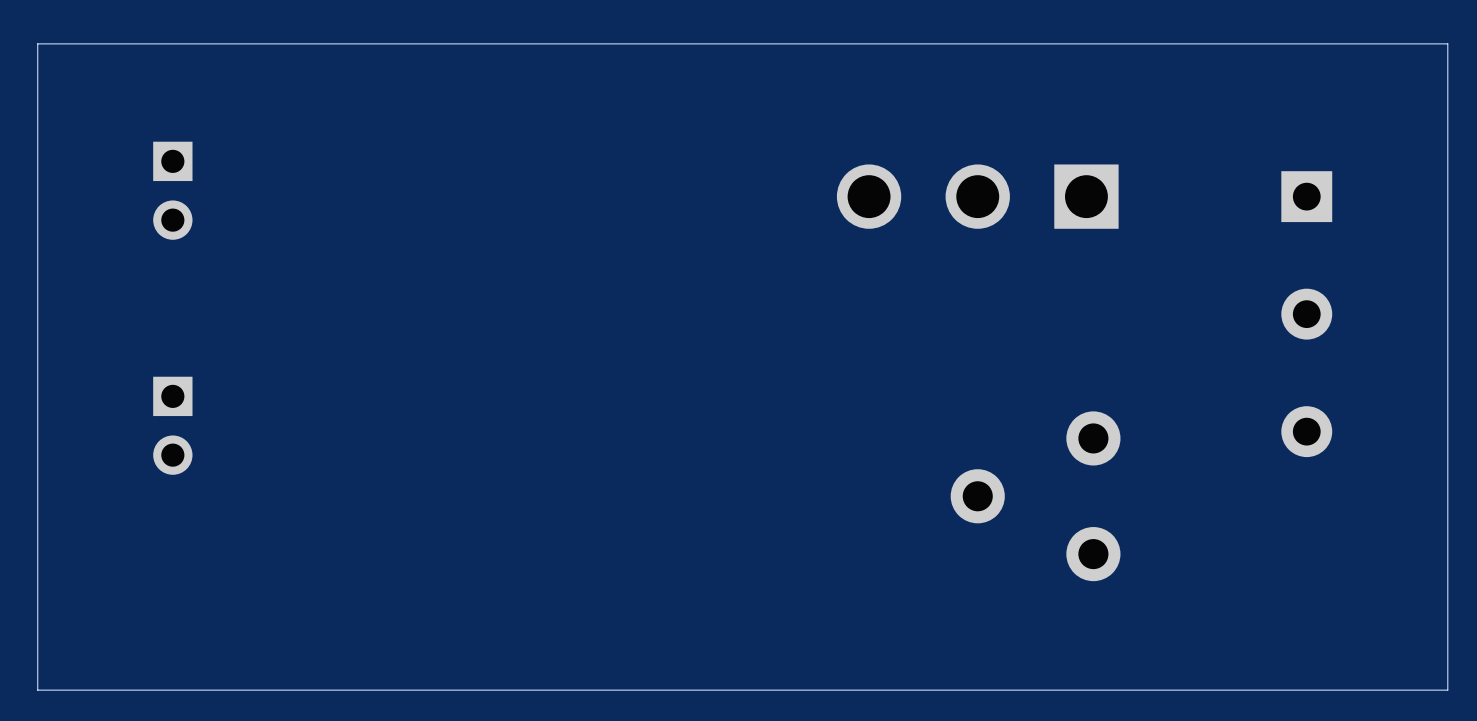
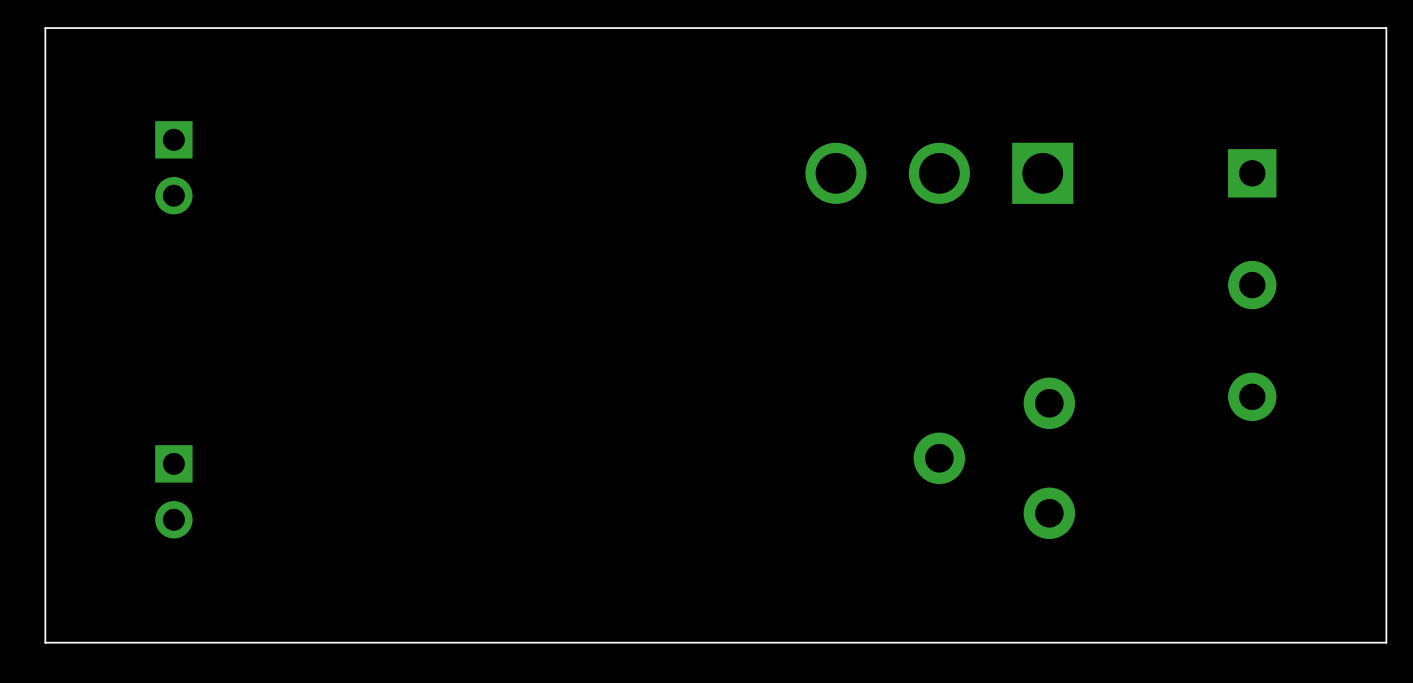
part position: (172, 425) -> (173, 491)

